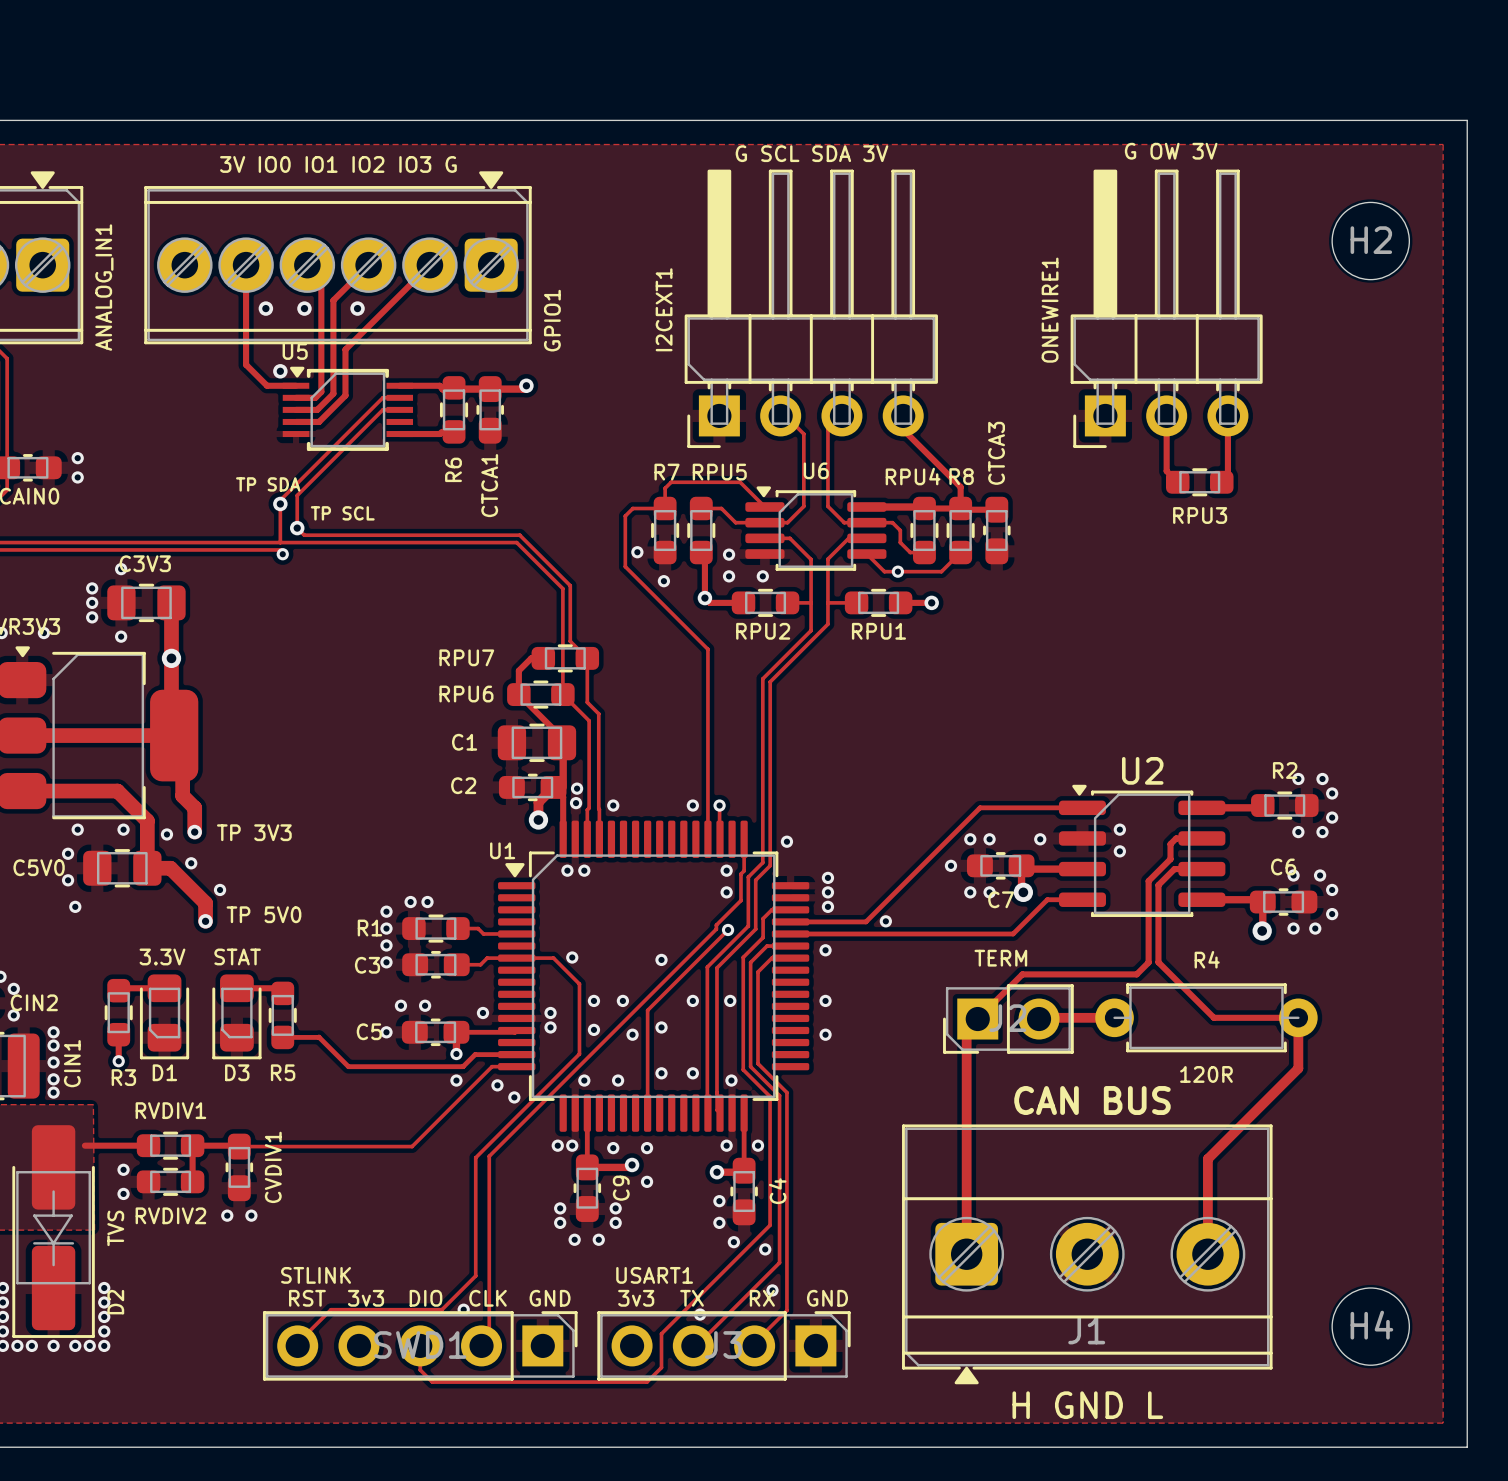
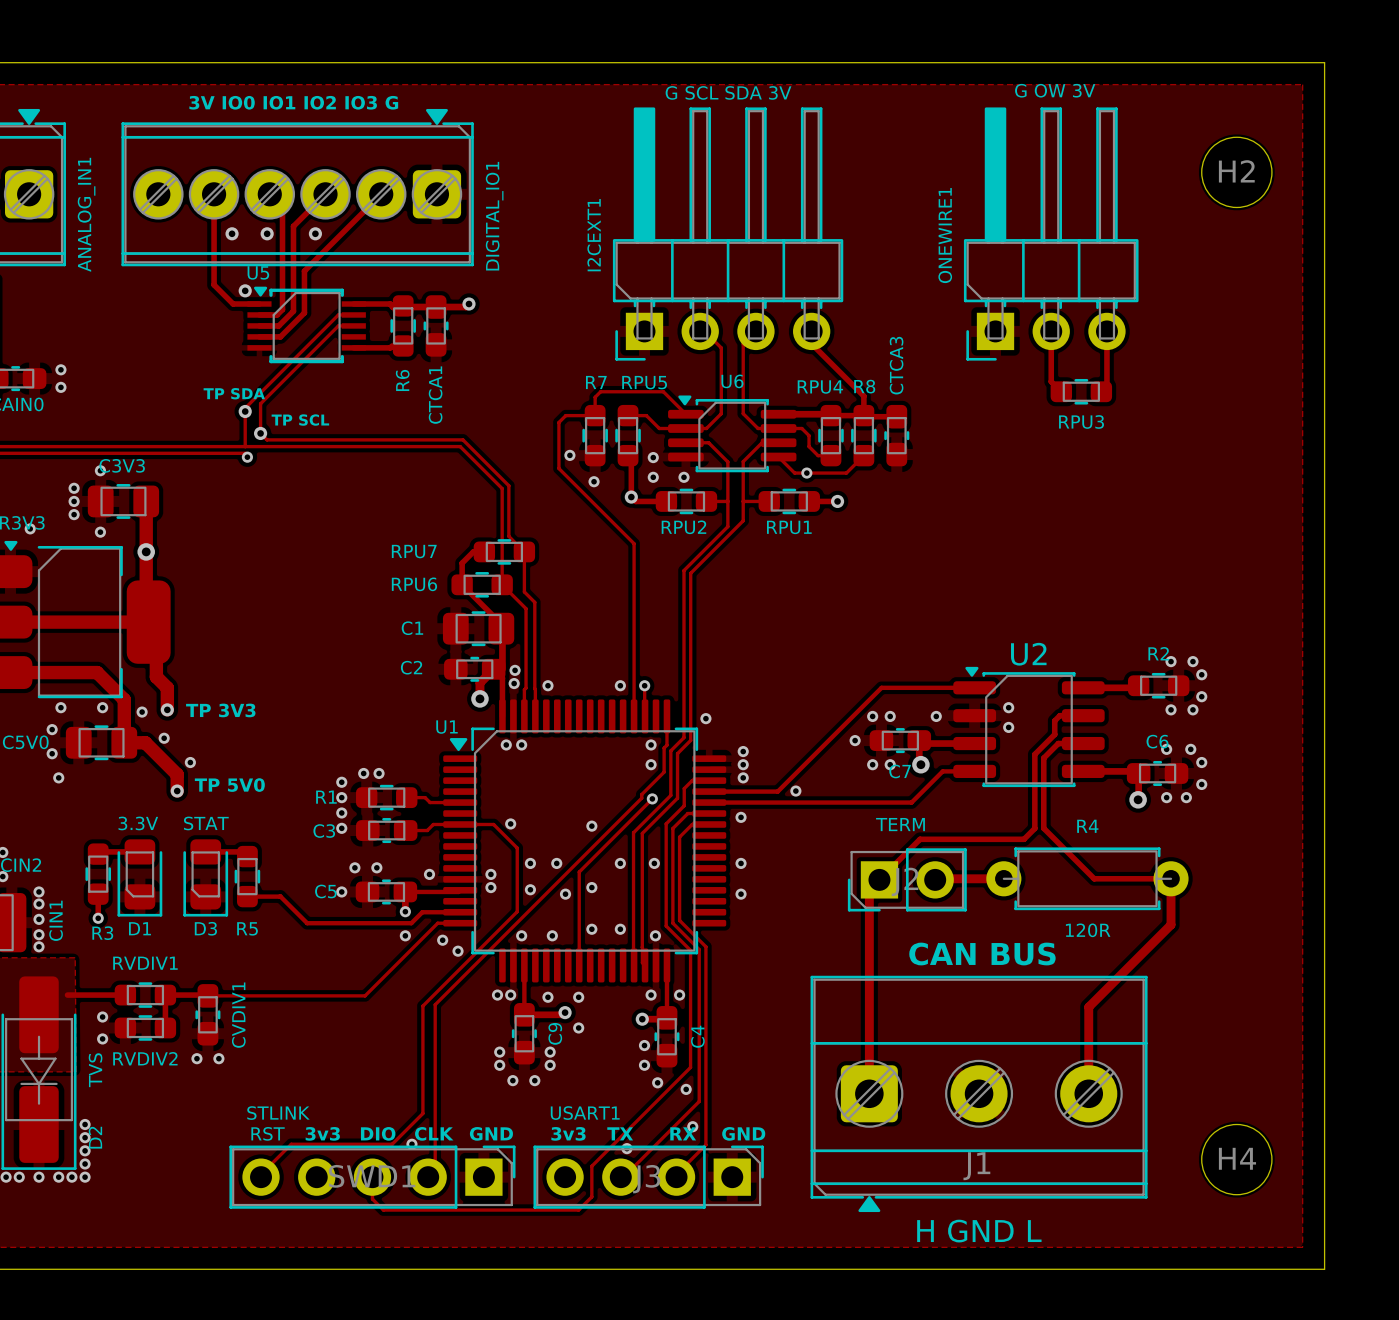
GPIO1 name: GPIO1 (552, 320) -> DIGITAL_IO1 (494, 216)

